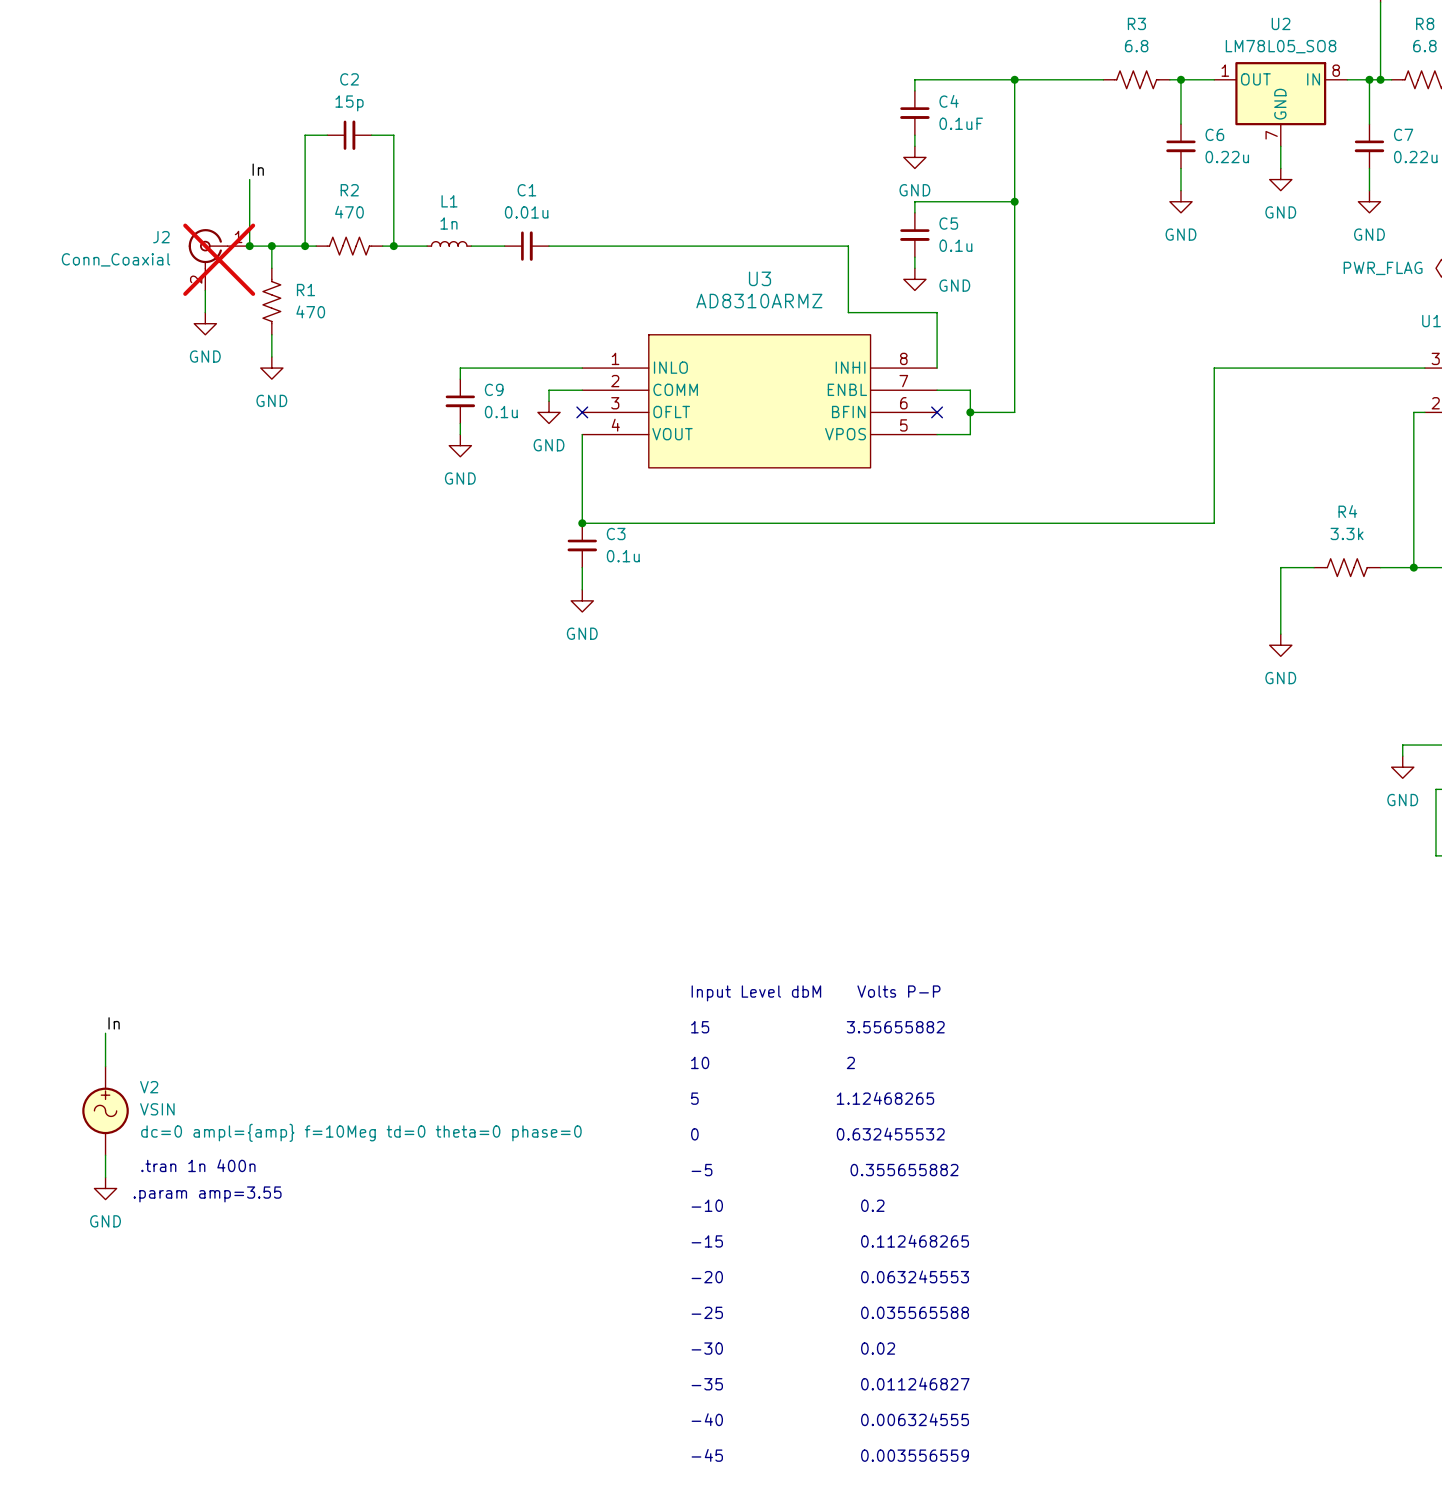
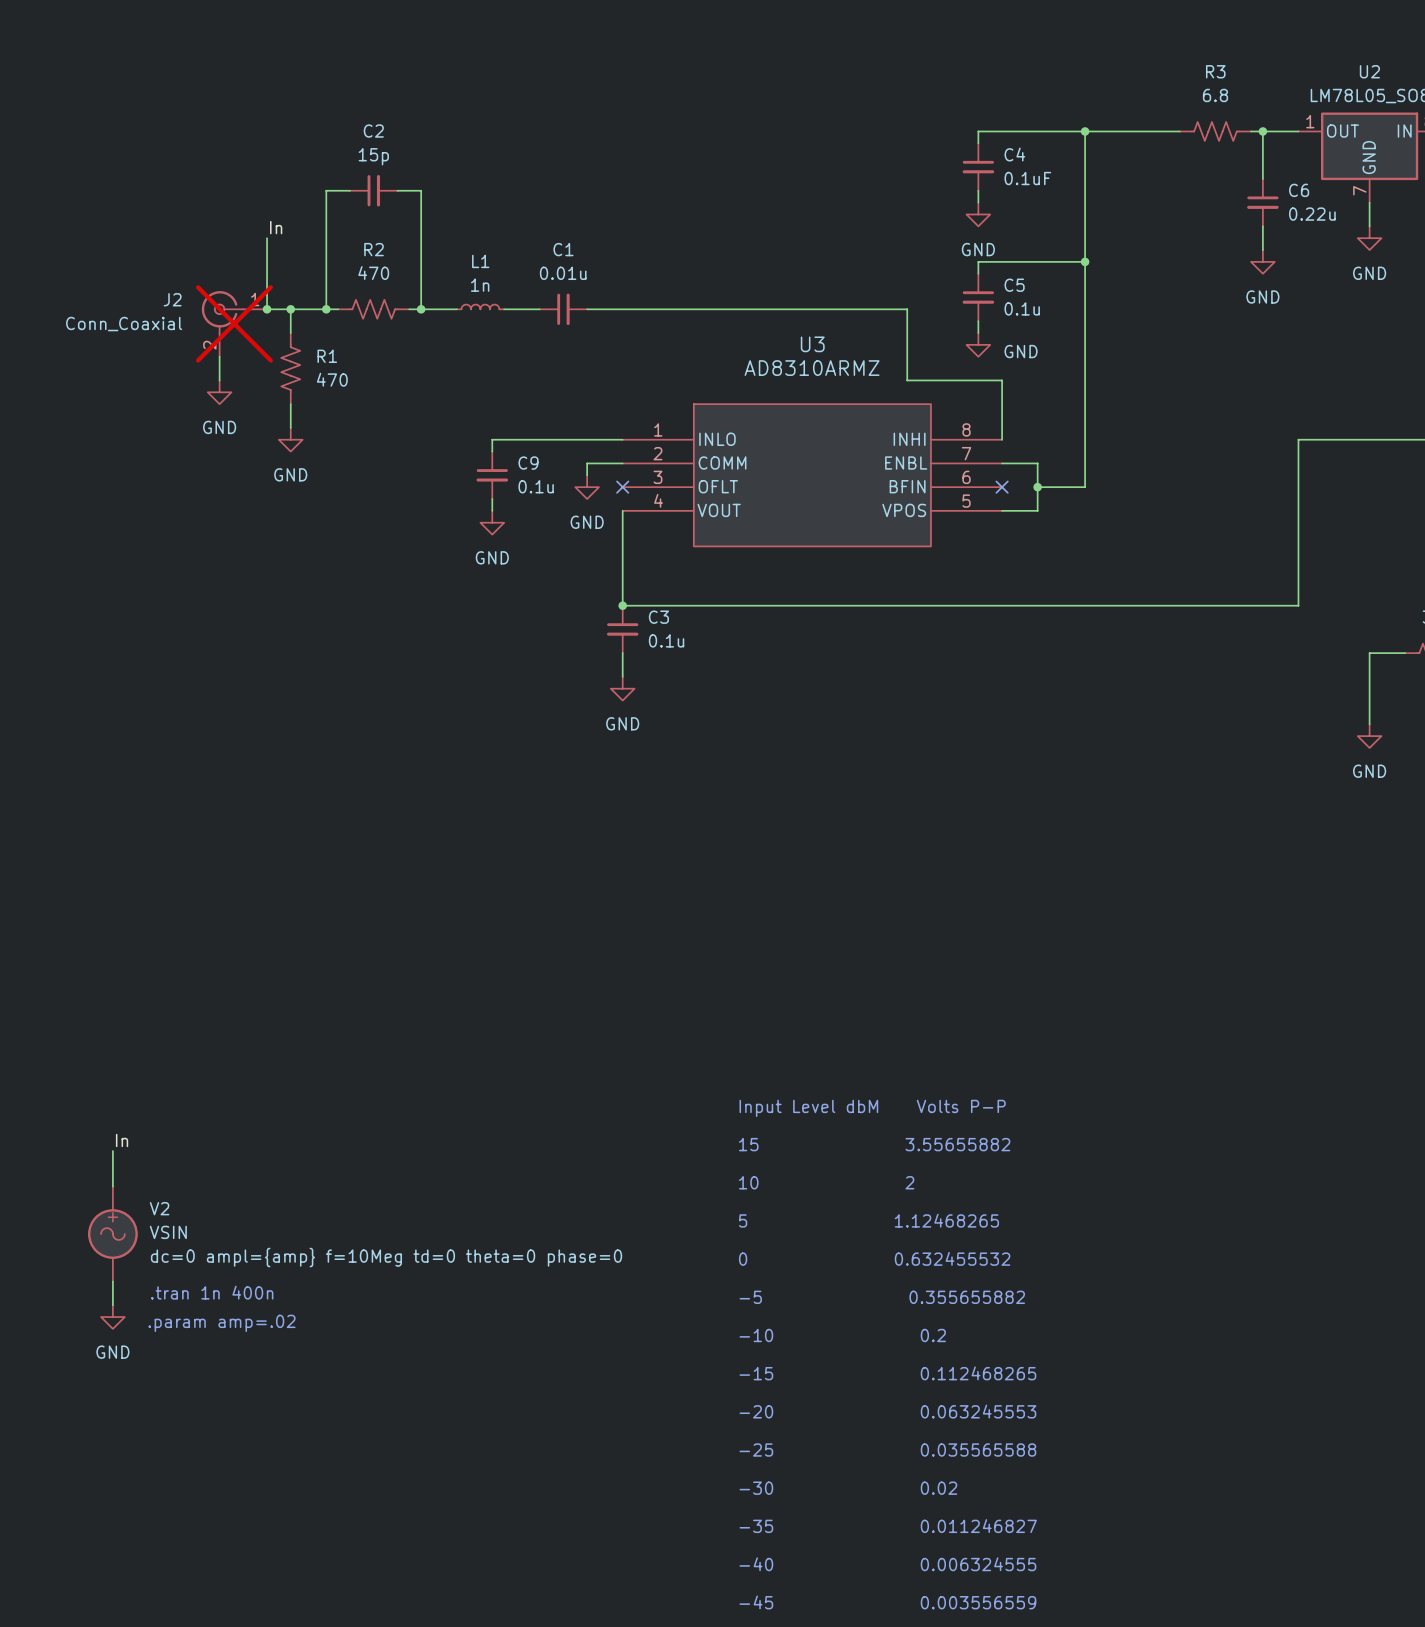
text: .param amp=3.55 (207, 1194) -> .param amp=.02 (221, 1323)

